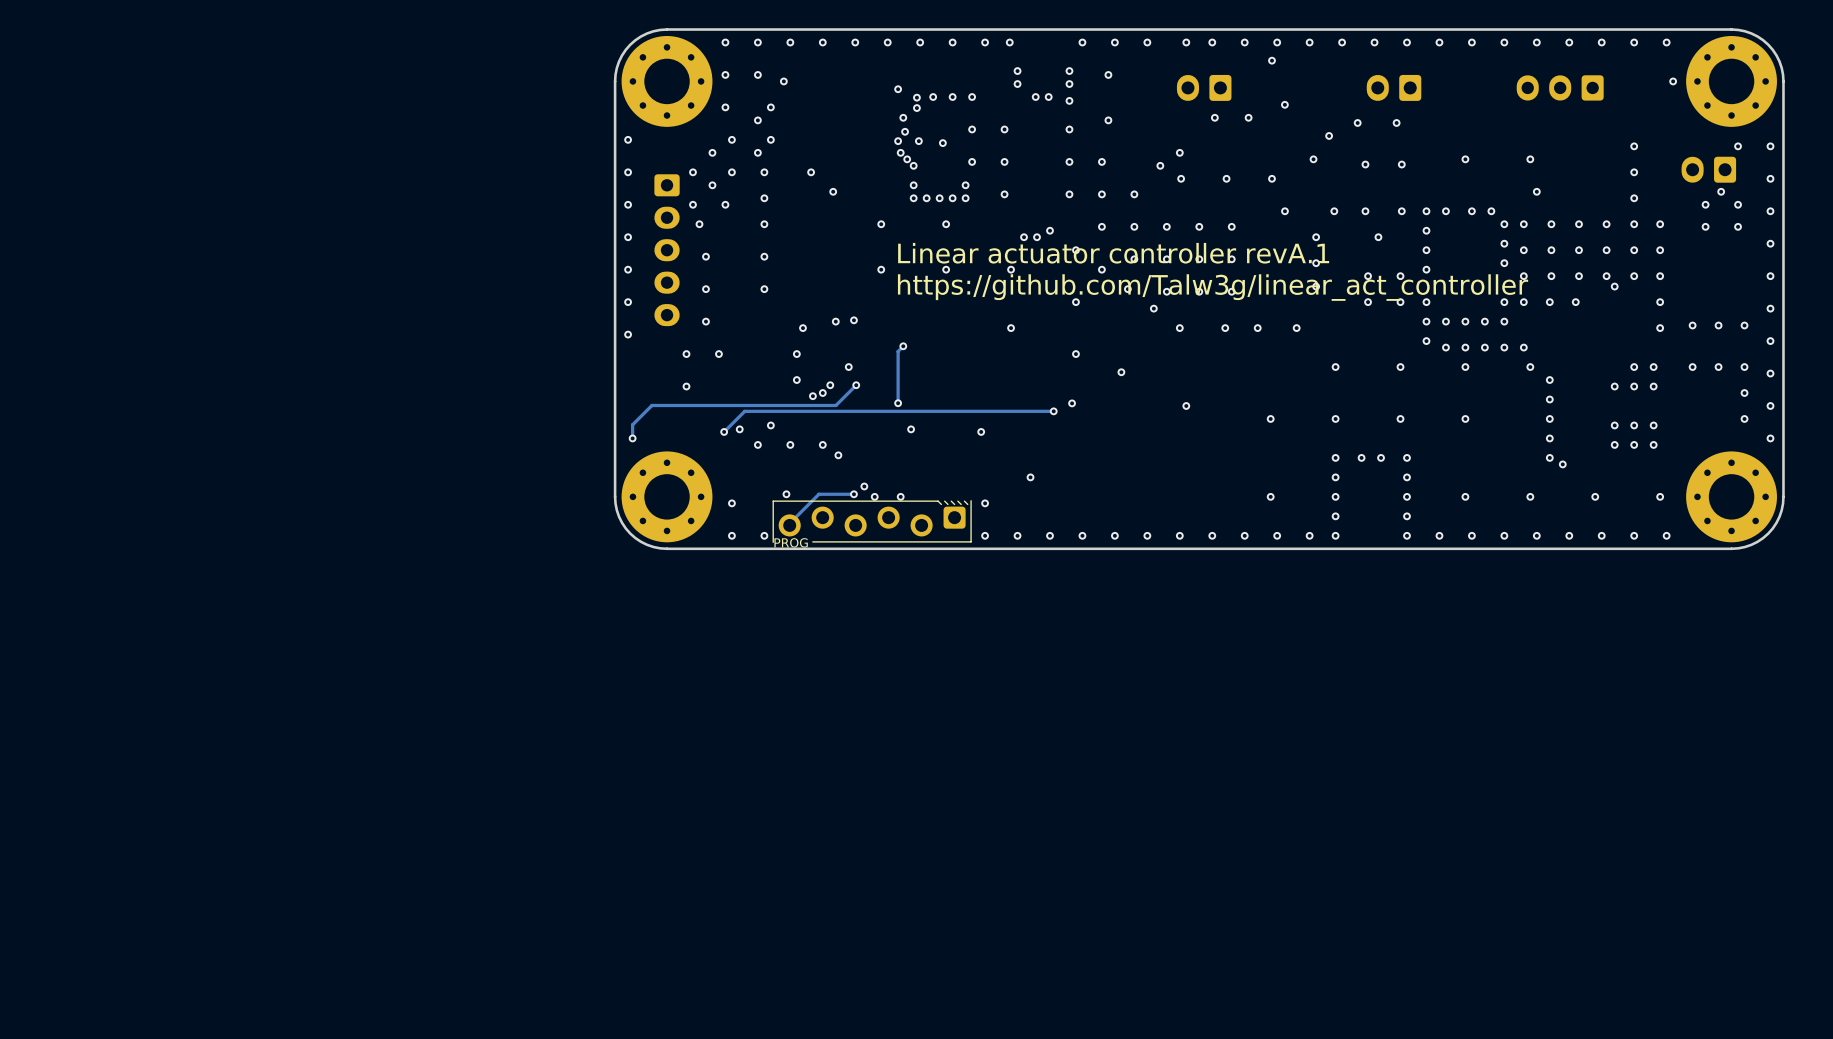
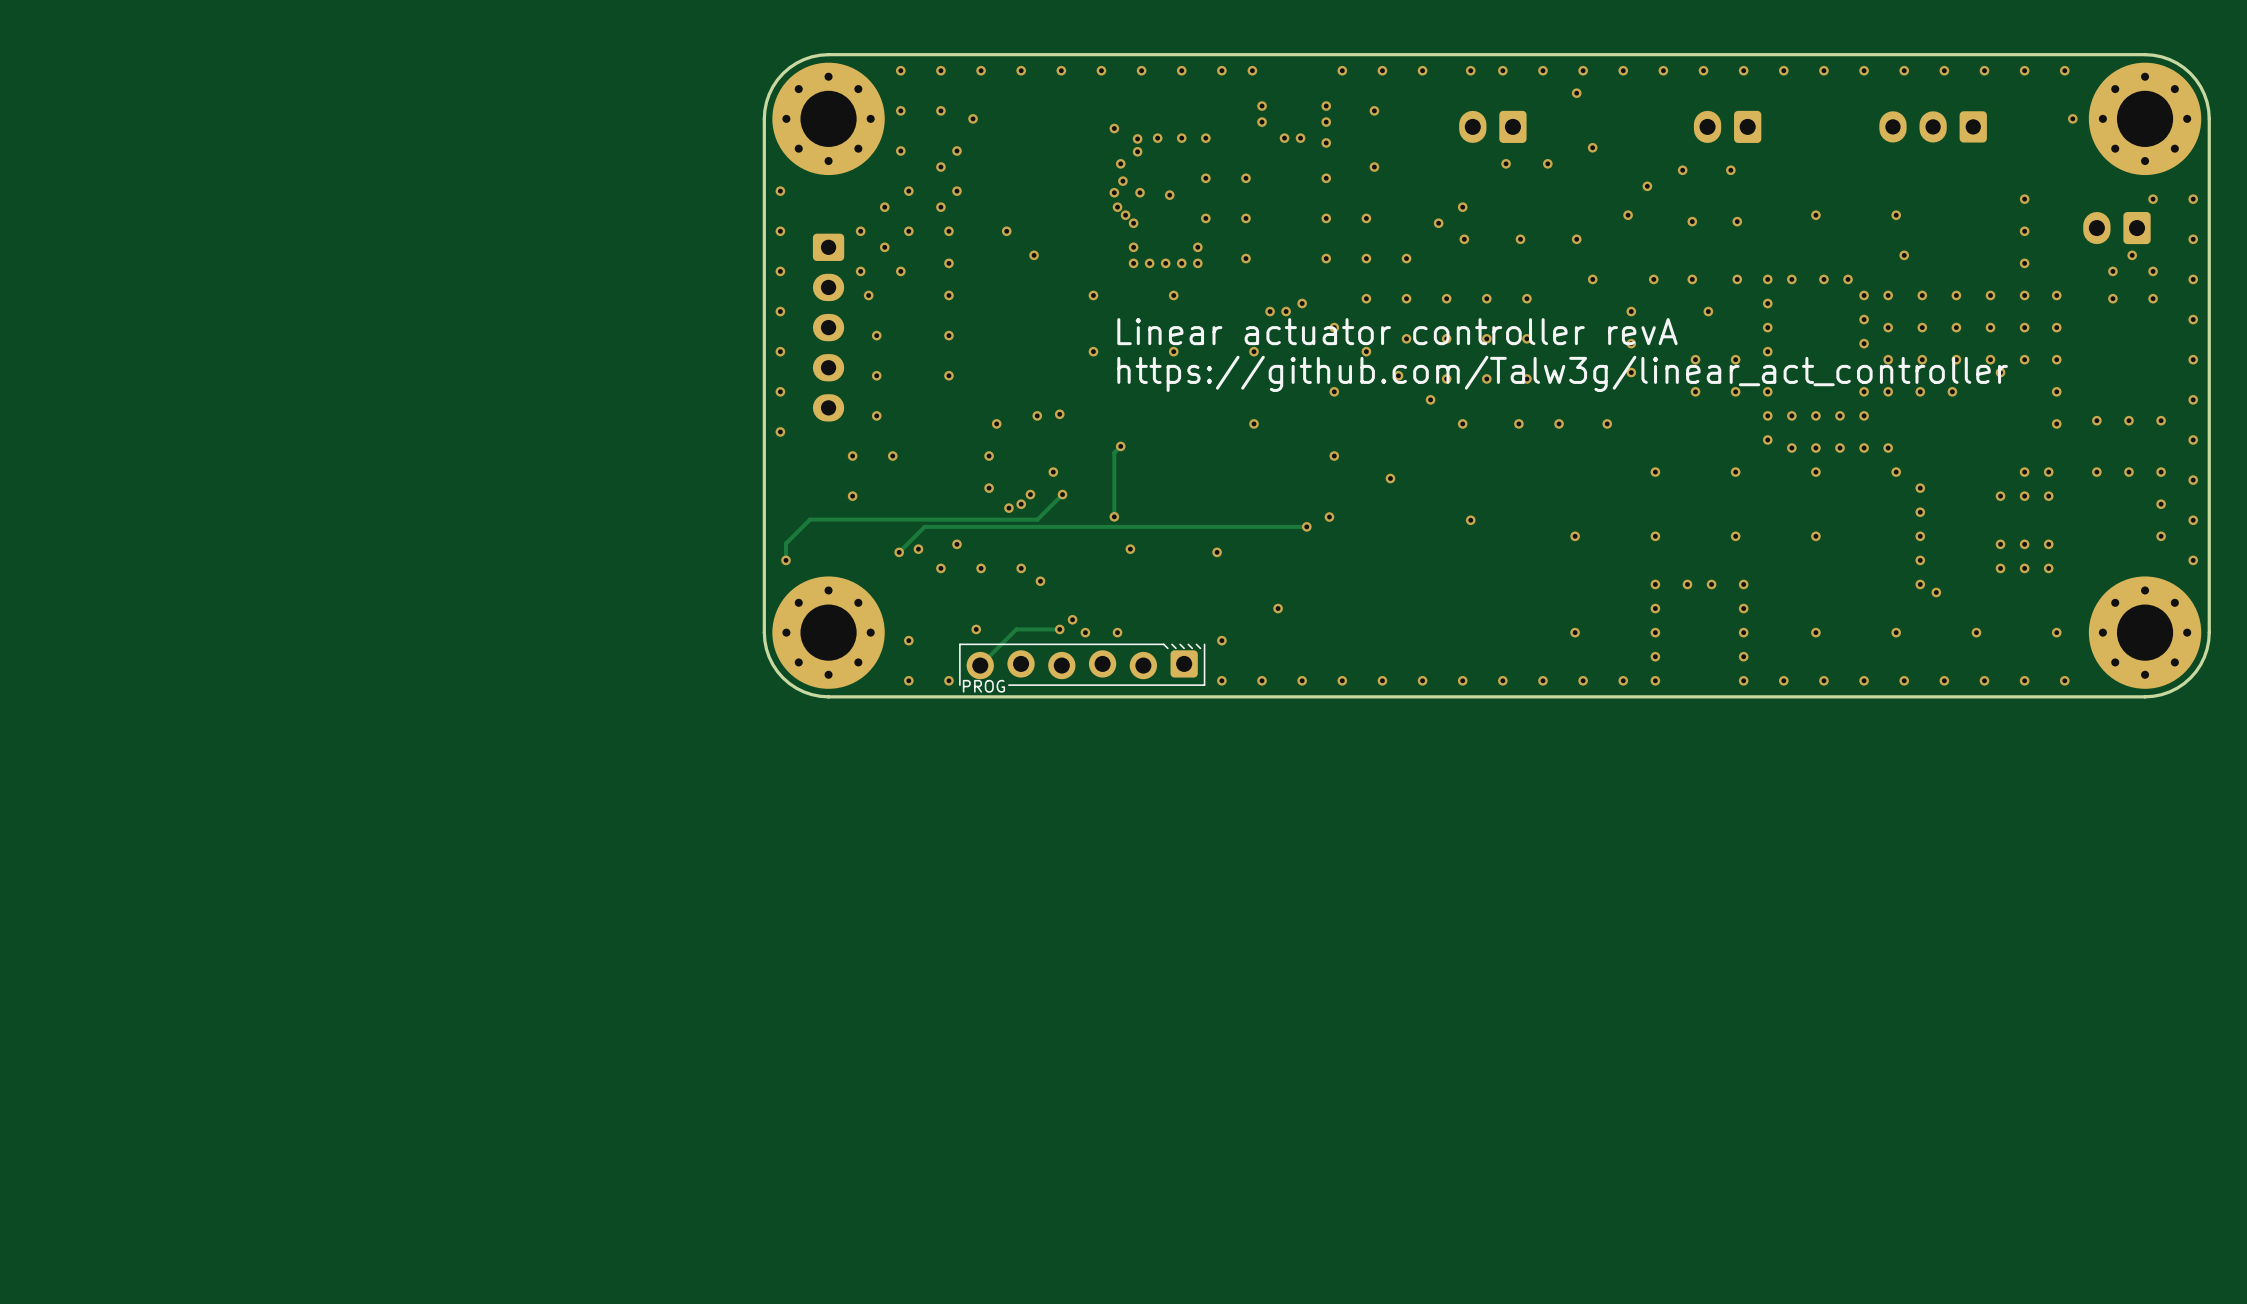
text: Linear actuator controller revA.1 (1113, 253) -> Linear actuator controller revA (1397, 331)
part footprint: [772, 500, 972, 543] -> [959, 643, 1206, 686]

